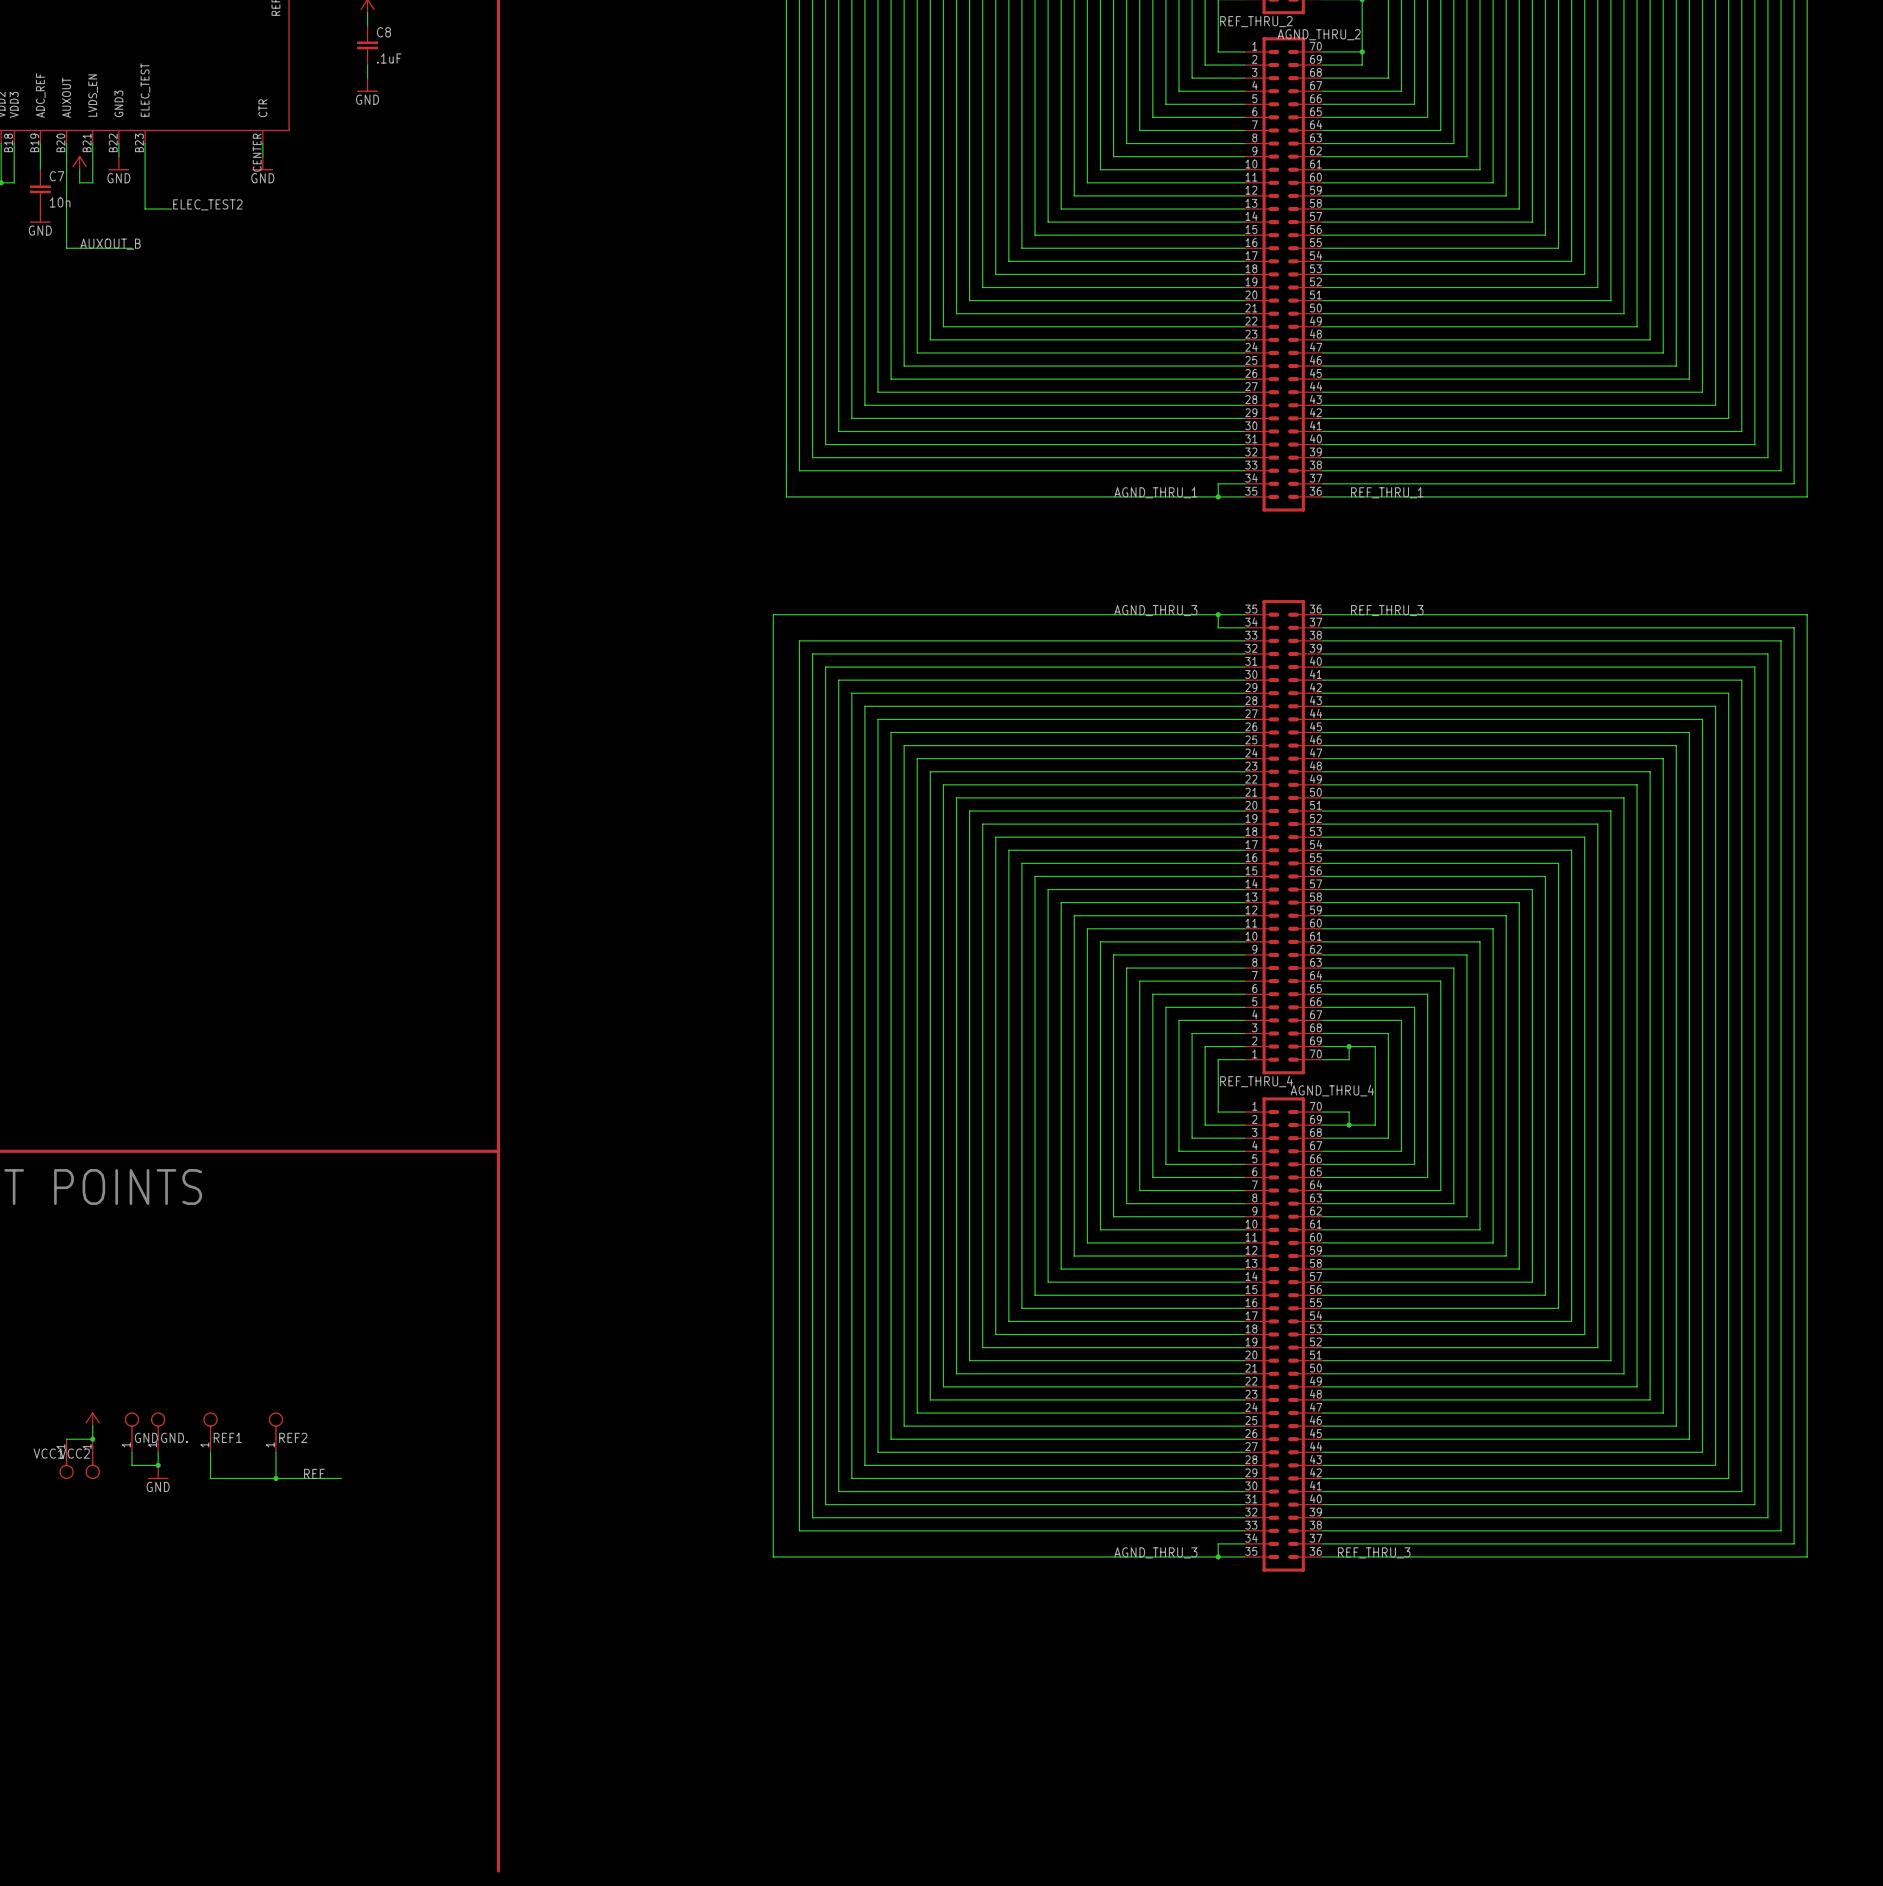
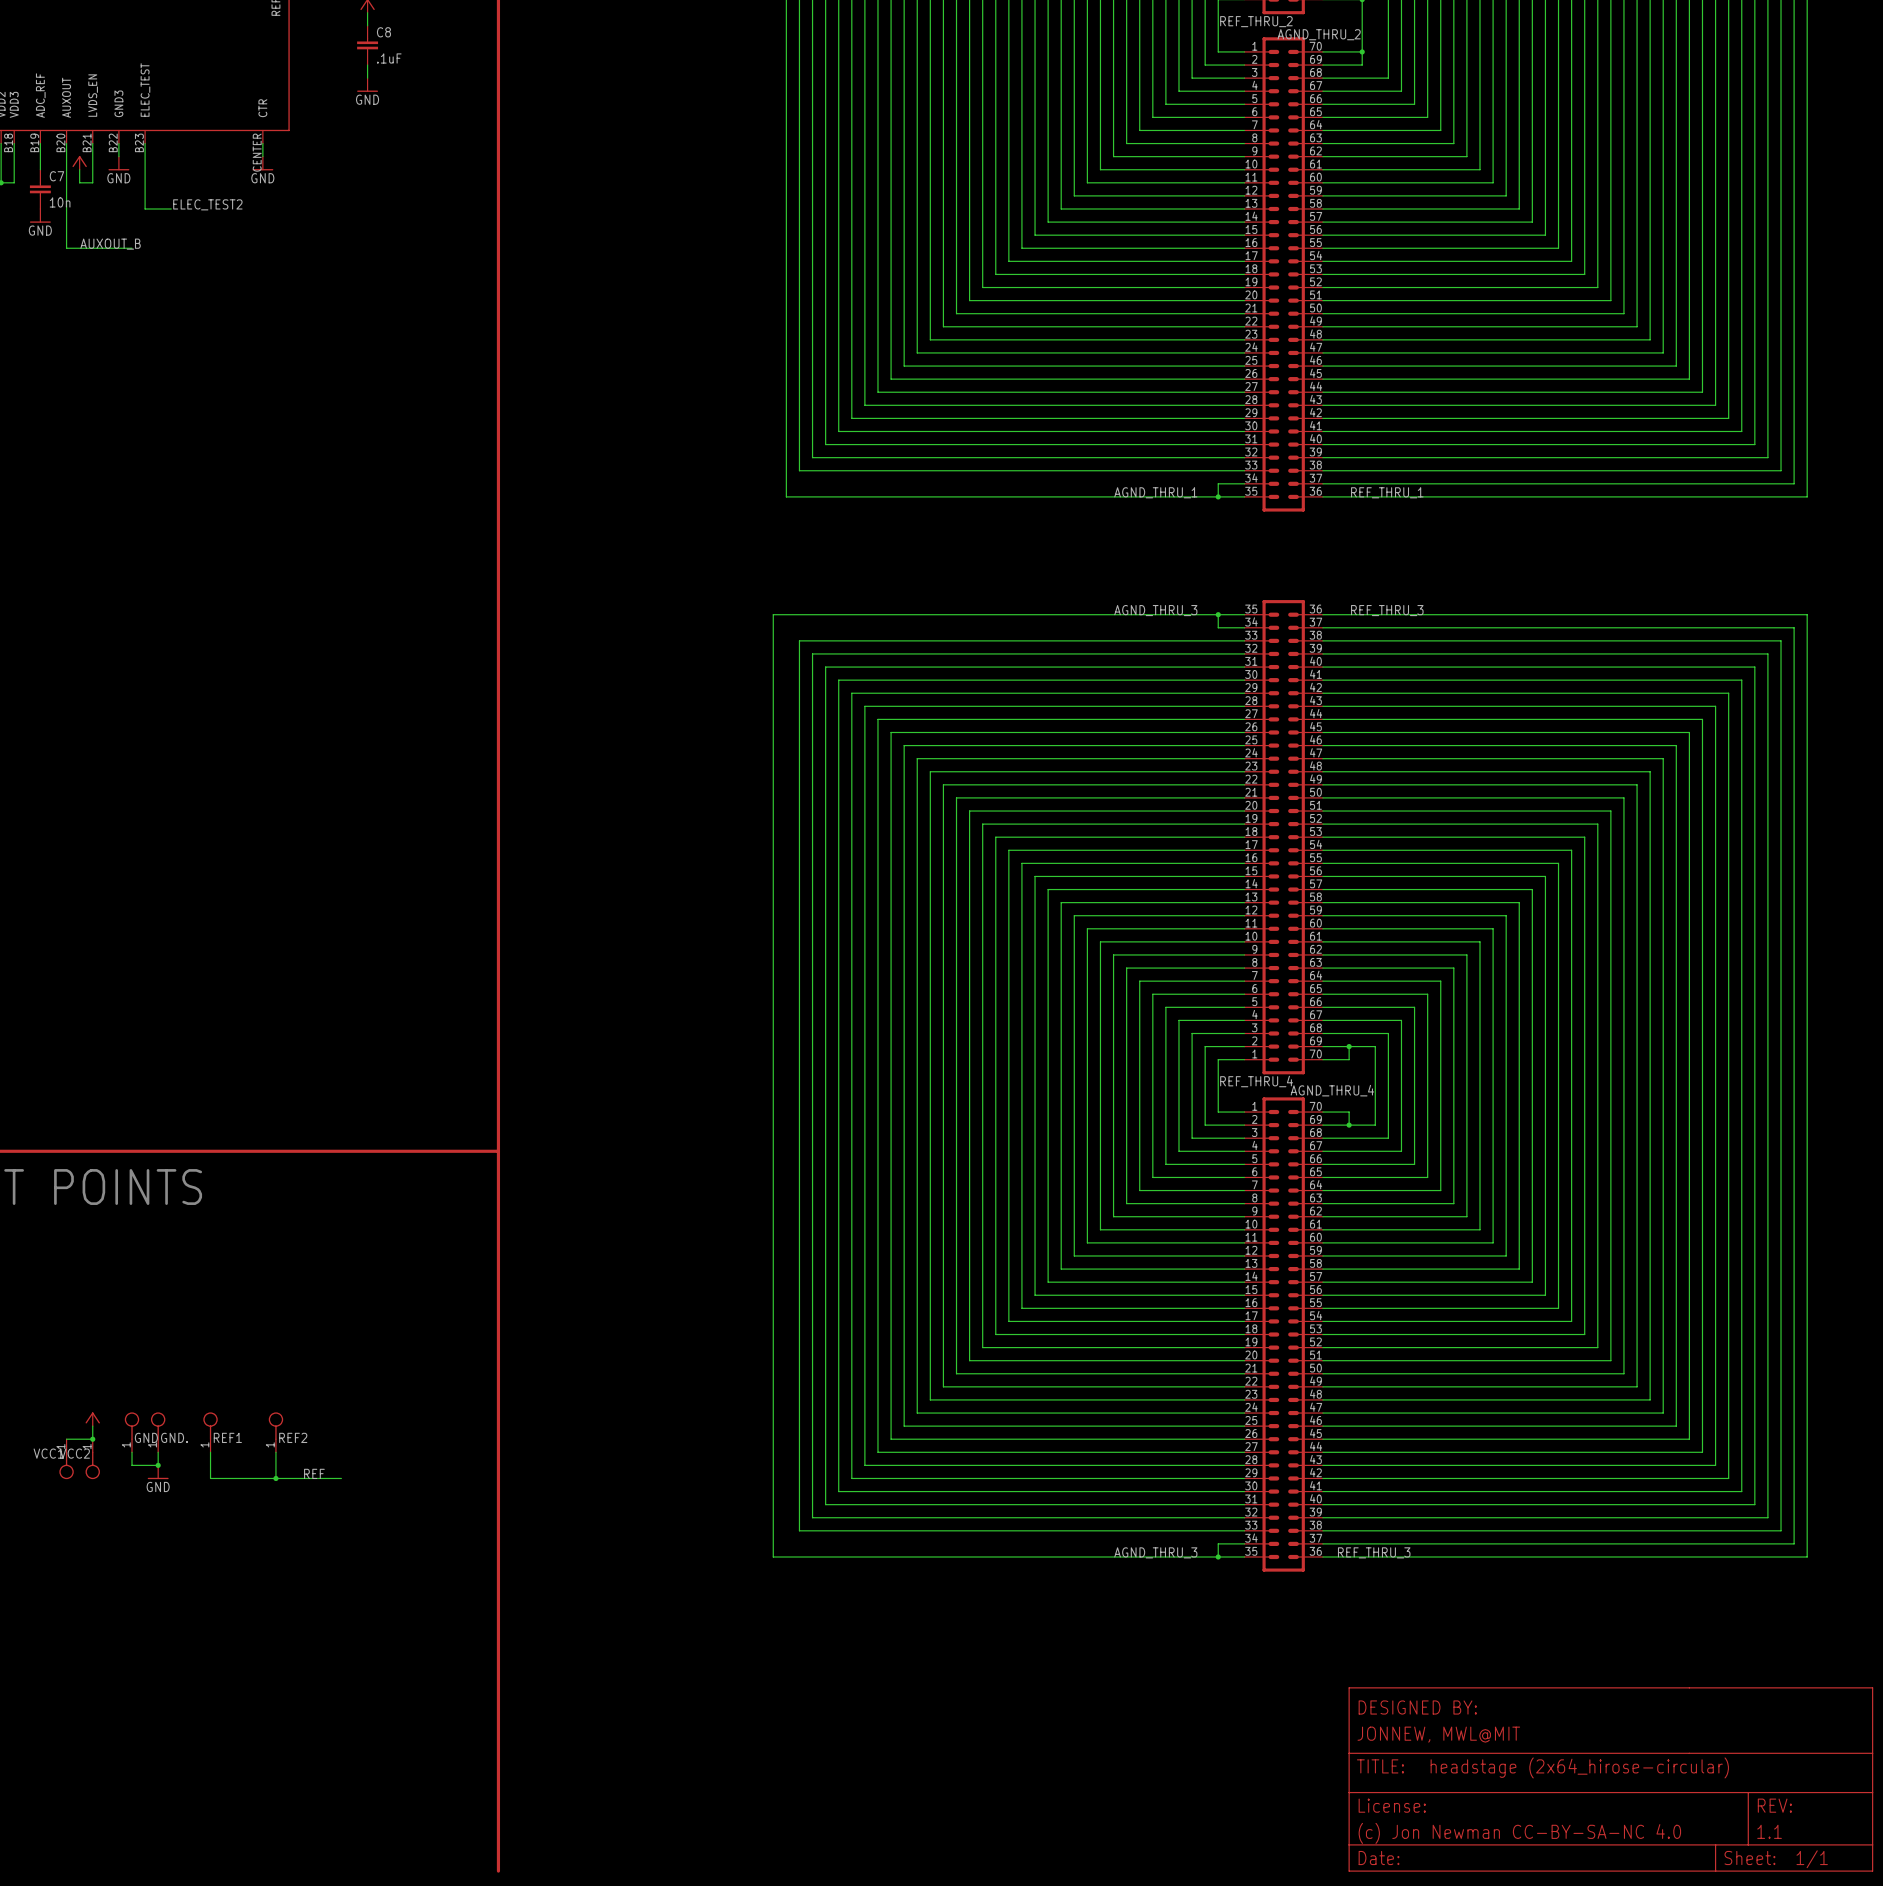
part: none -> (1610, 1779)

